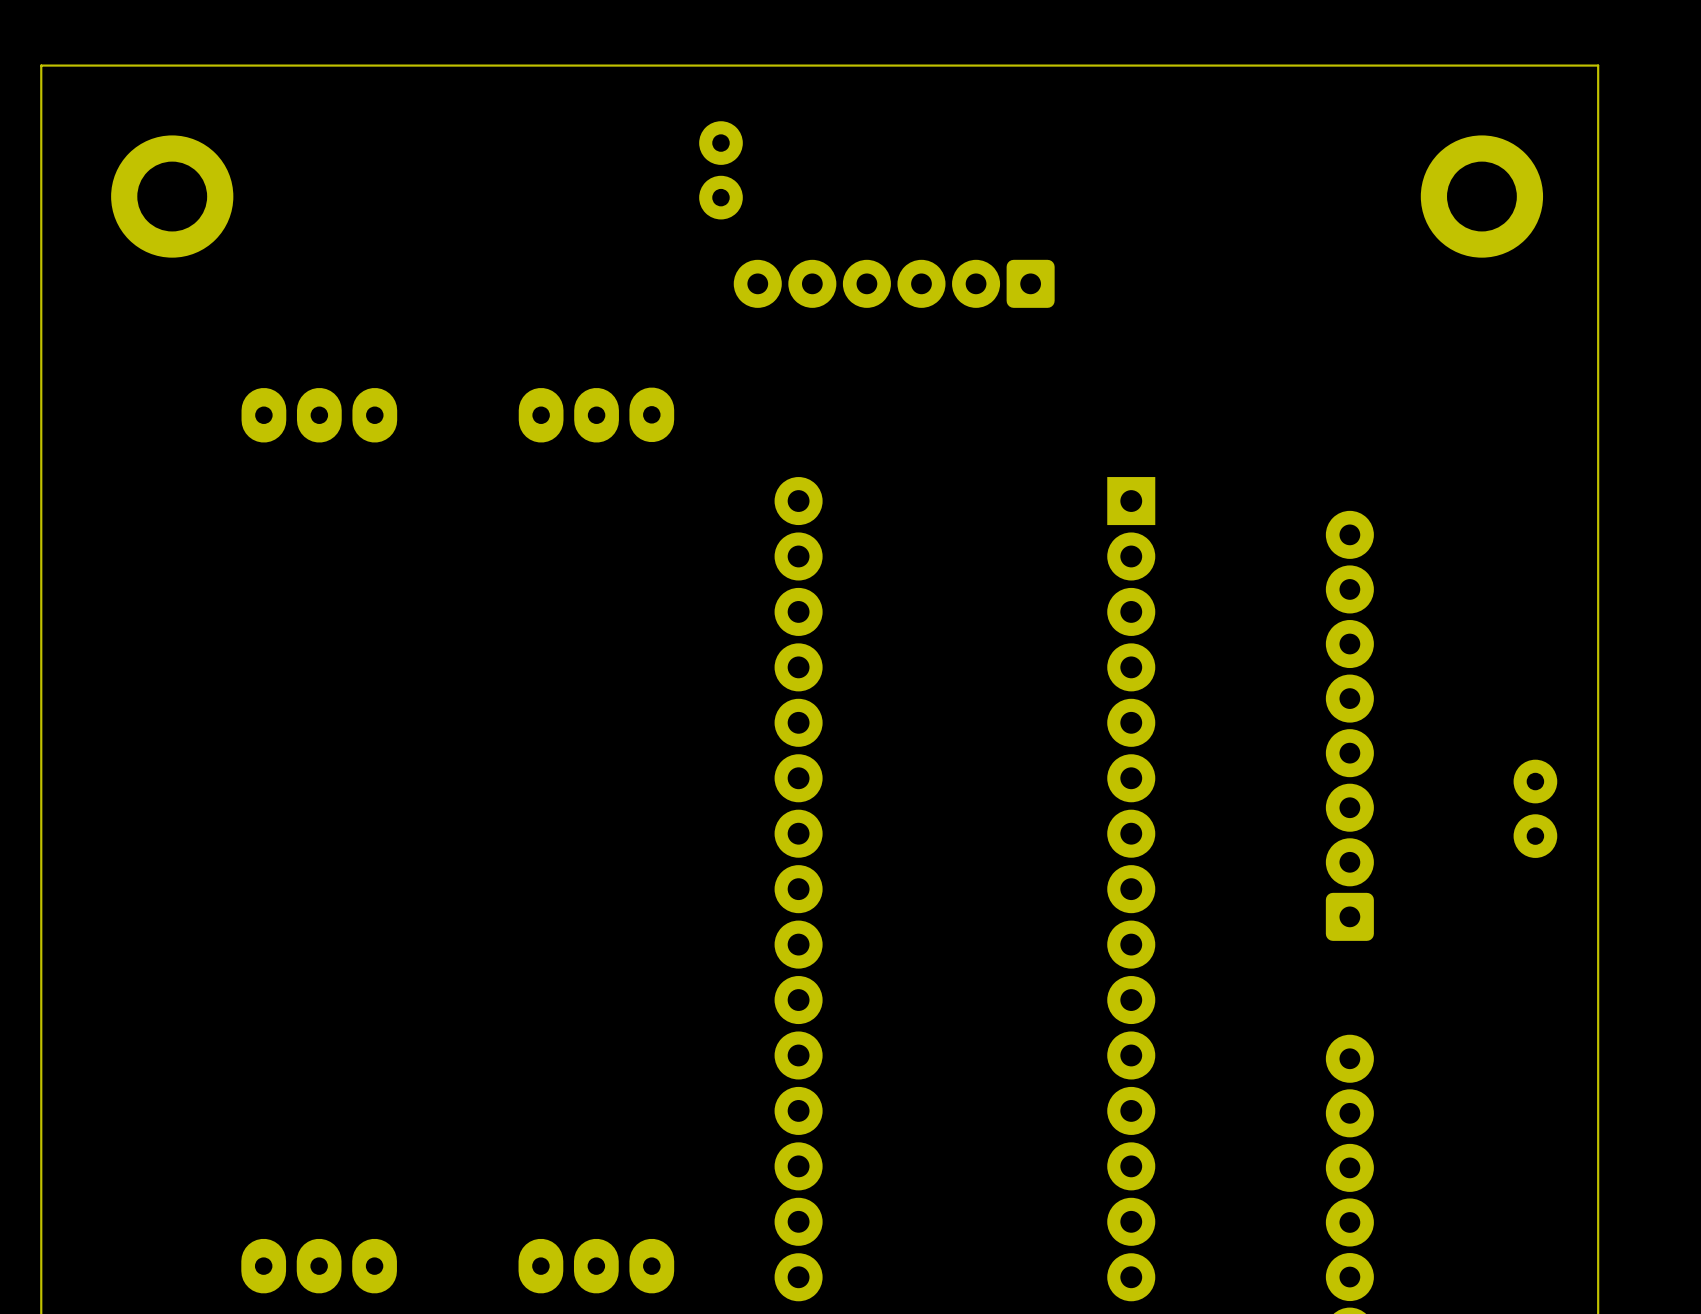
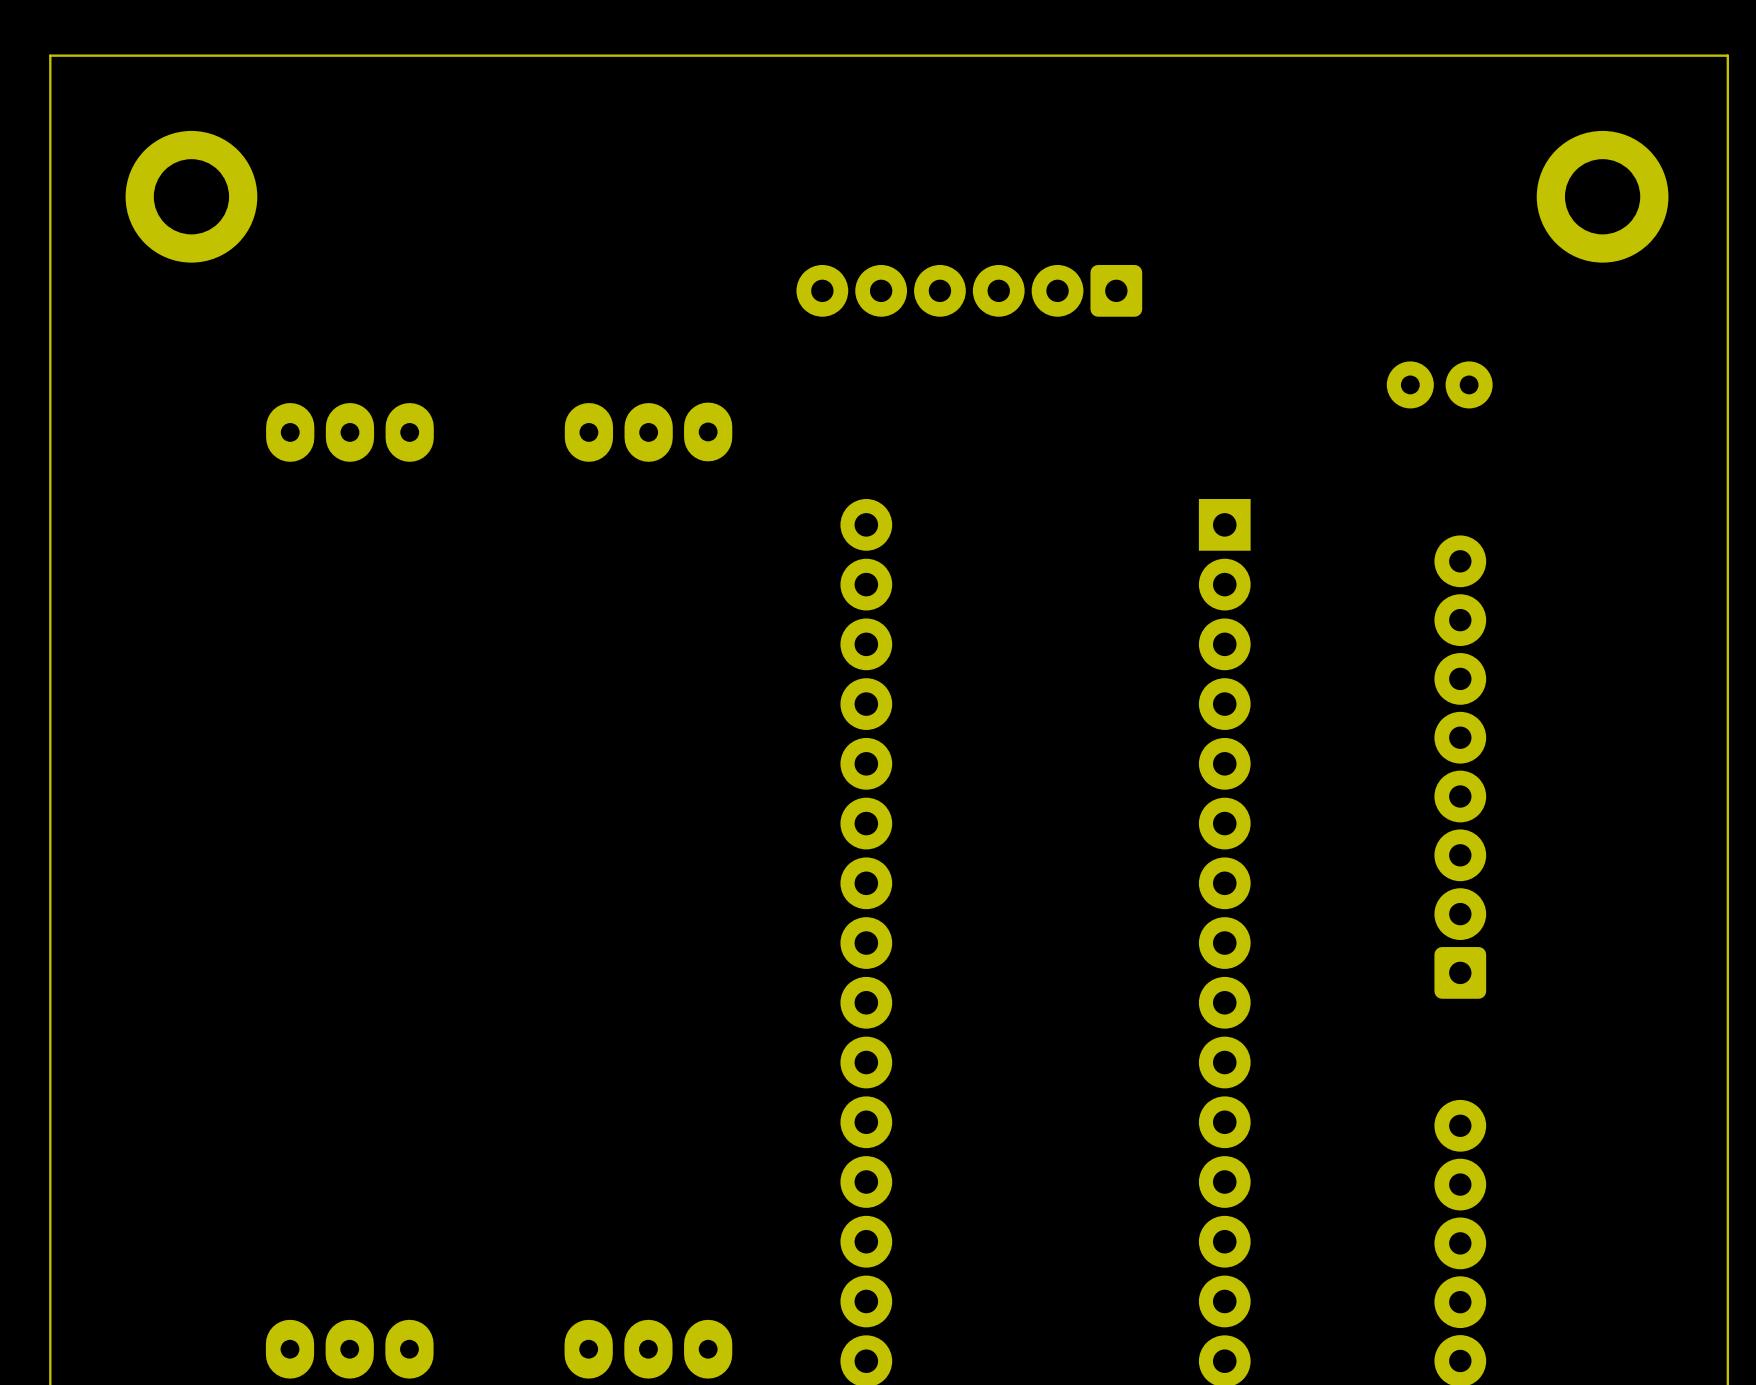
part: (720, 170) -> none
part: none -> (1439, 384)
part: (1535, 808) -> none

